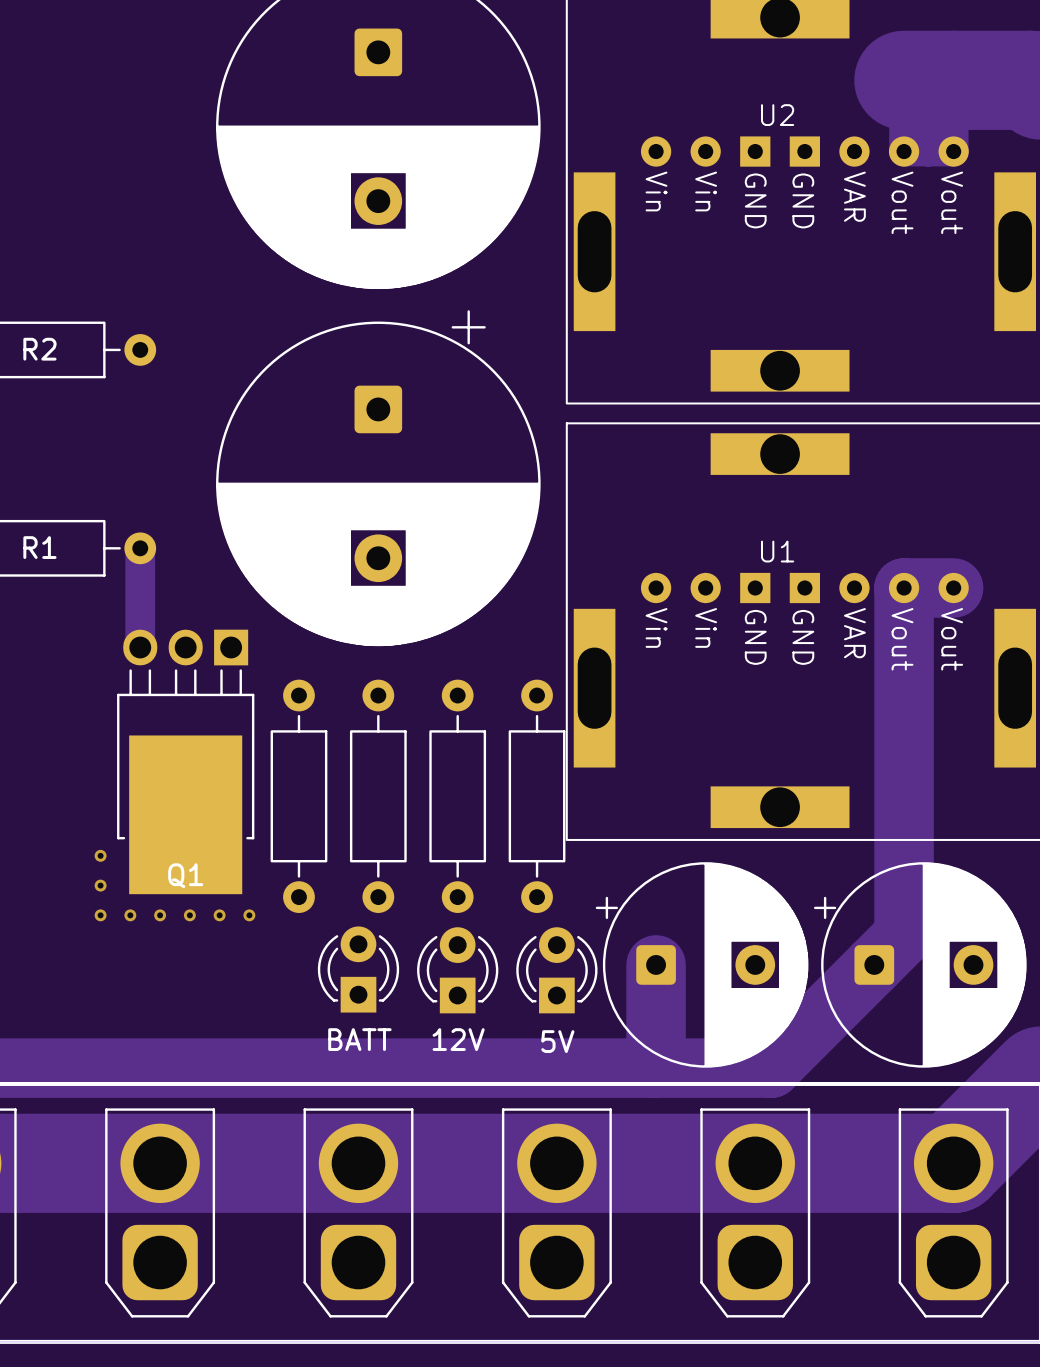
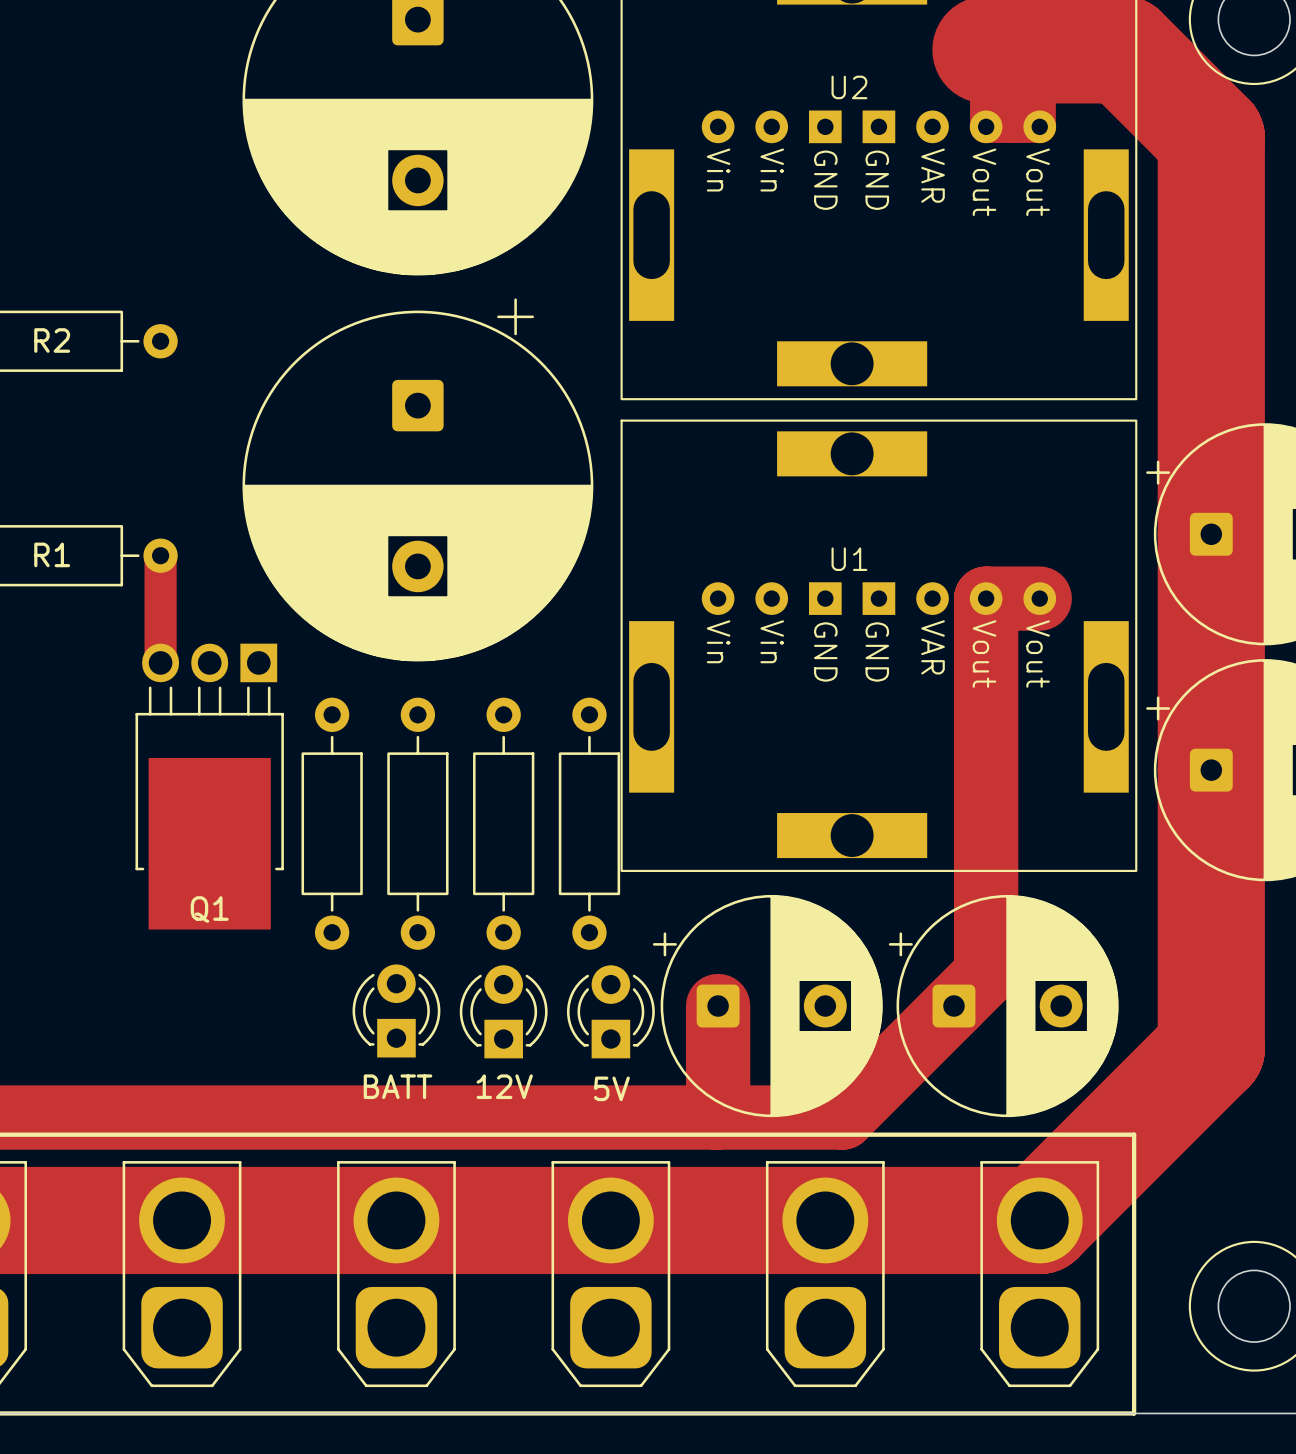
via: (100, 855) -> none
via: (100, 885) -> none
via: (100, 915) -> none
via: (130, 915) -> none
via: (160, 915) -> none
via: (189, 915) -> none
via: (219, 915) -> none
via: (249, 915) -> none

